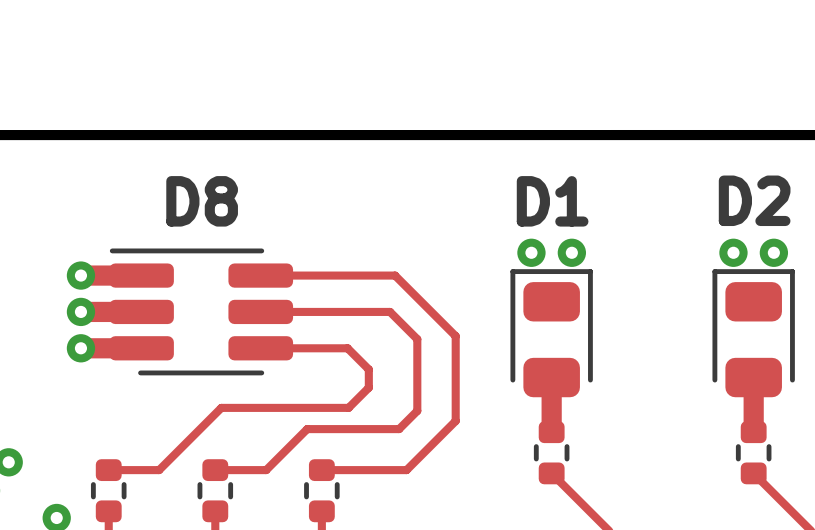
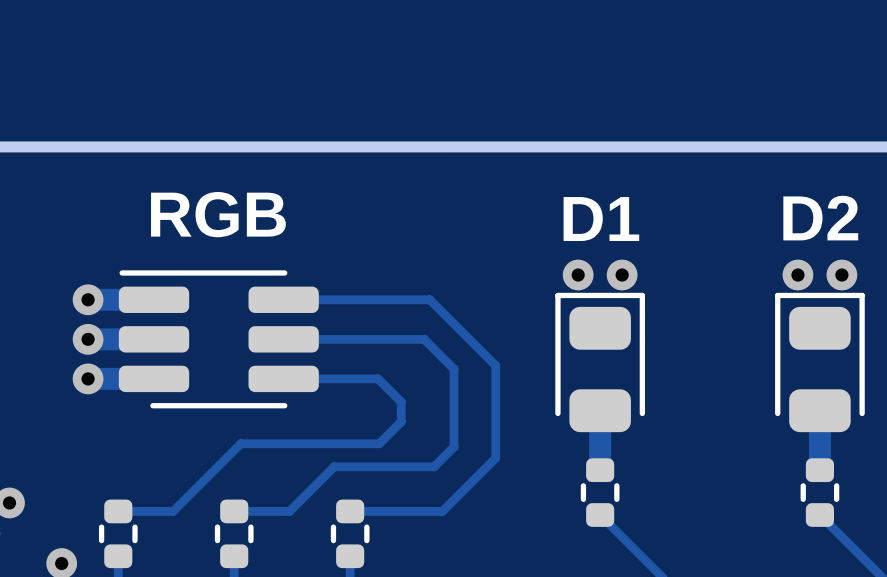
text: none -> RGB (218, 214)
D8 name: D8 (202, 201) -> none

